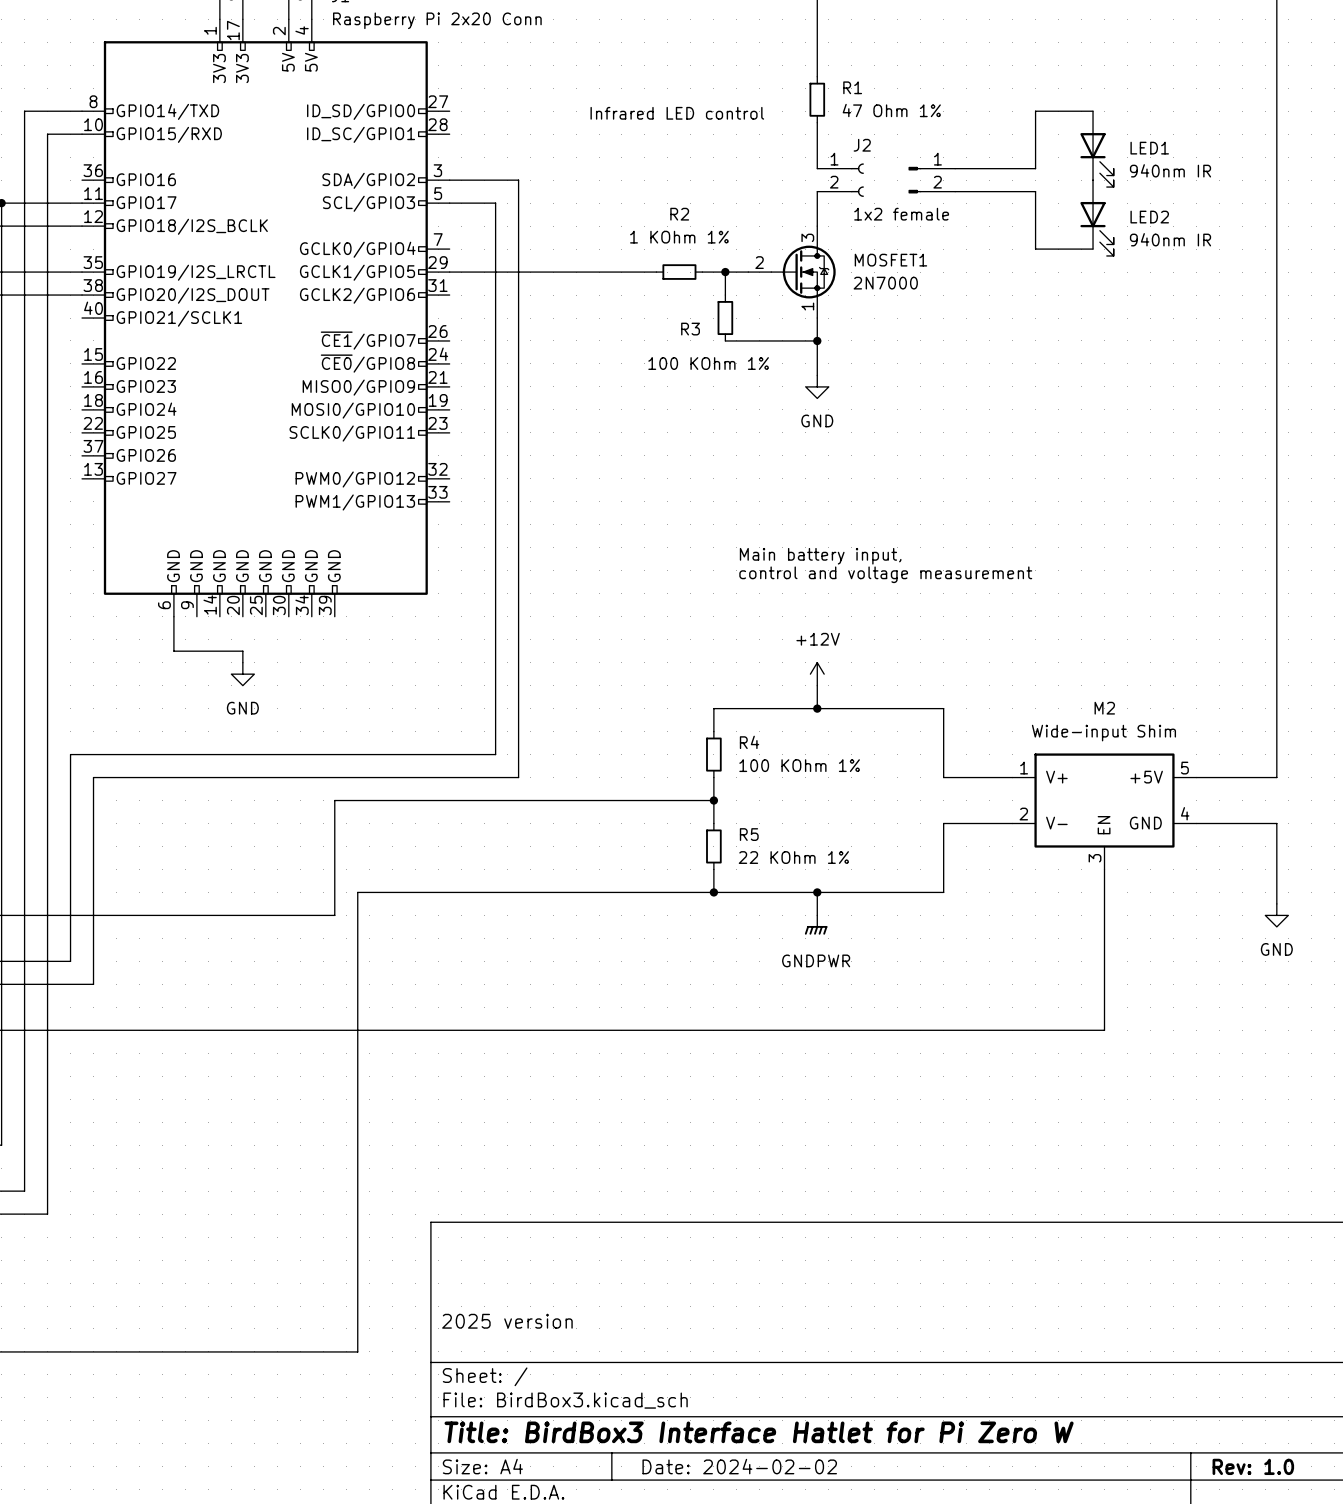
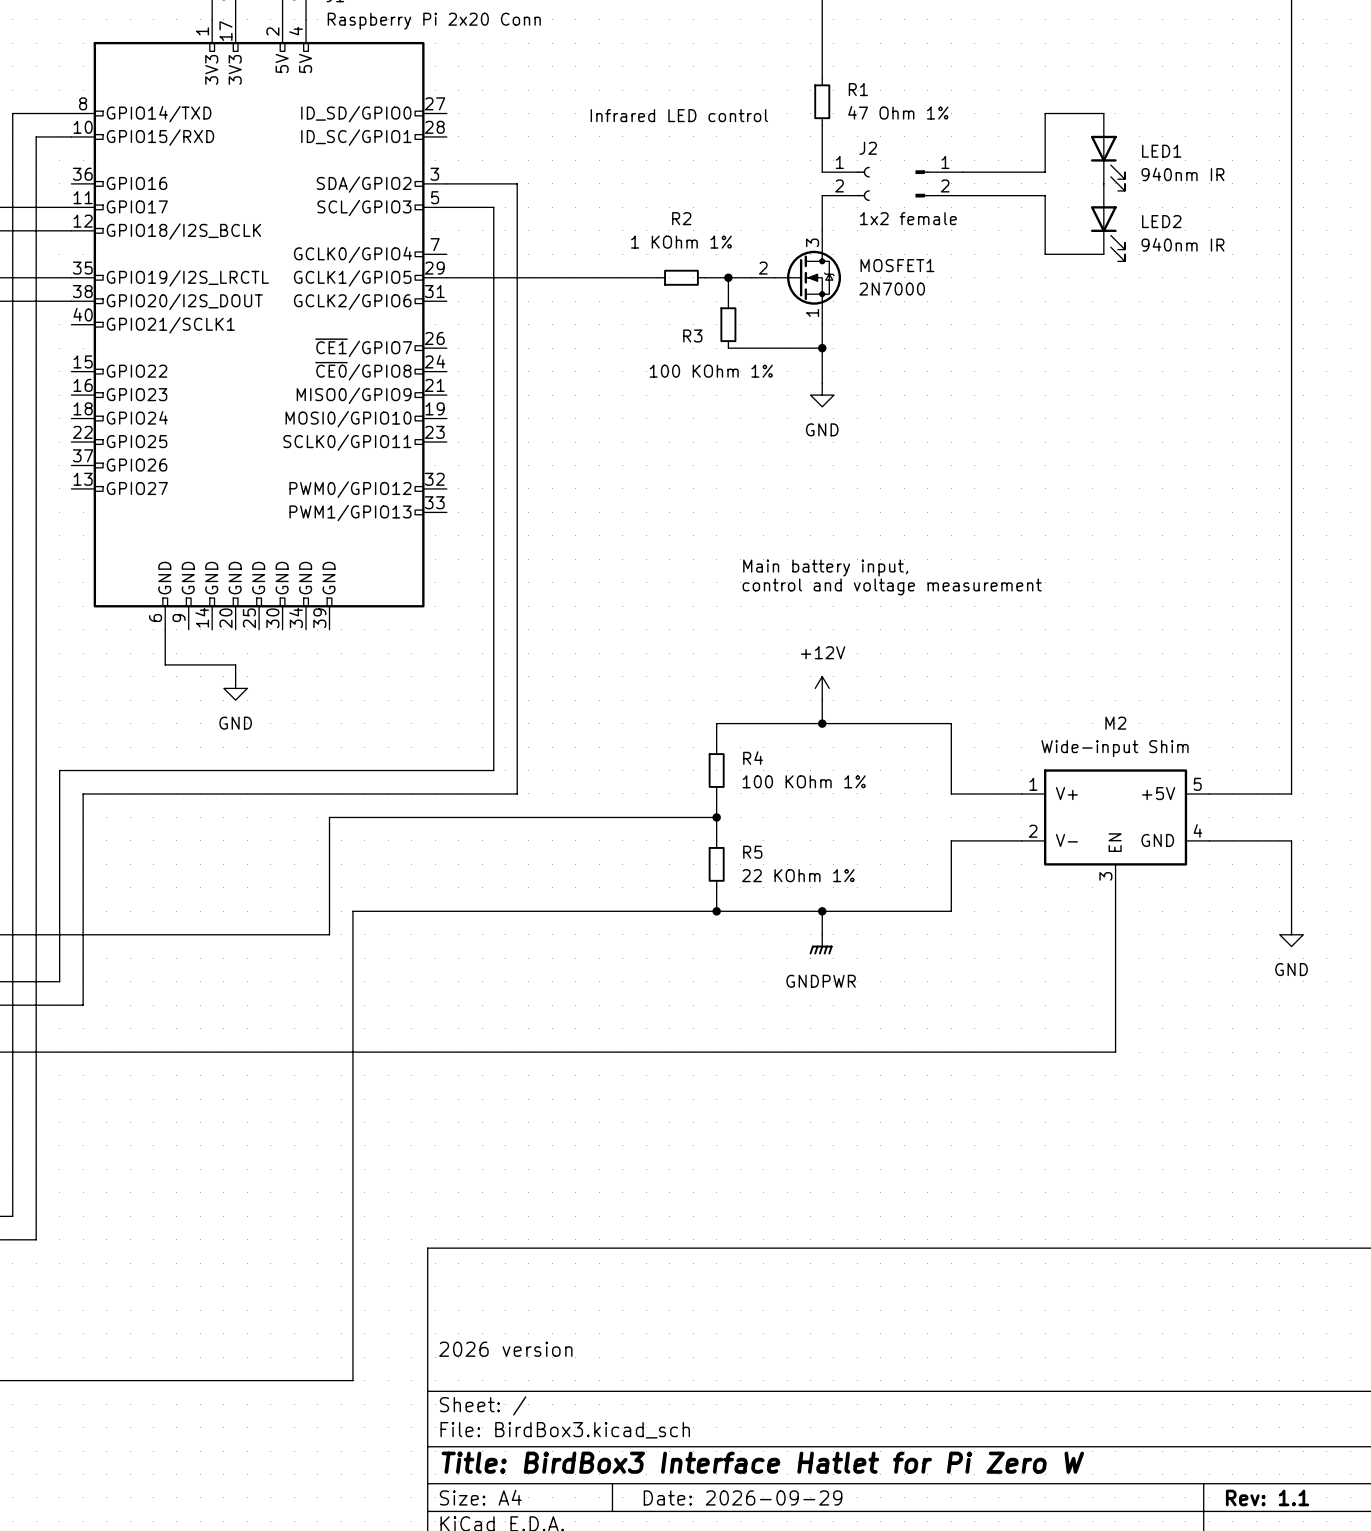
title block: 2025 version (507, 1321) -> 2026 version (505, 1349)
title block: Date: 2024-02-02 (739, 1466) -> Date: 2026-09-29 (743, 1497)
title block: Rev: 1.0 (1253, 1466) -> Rev: 1.1 (1267, 1497)

